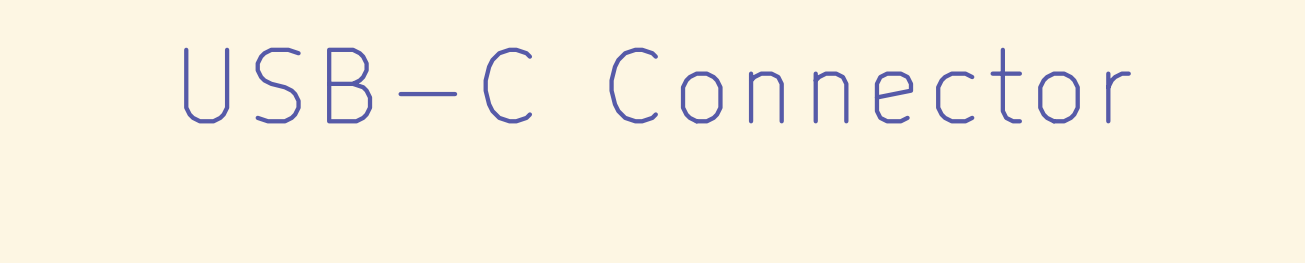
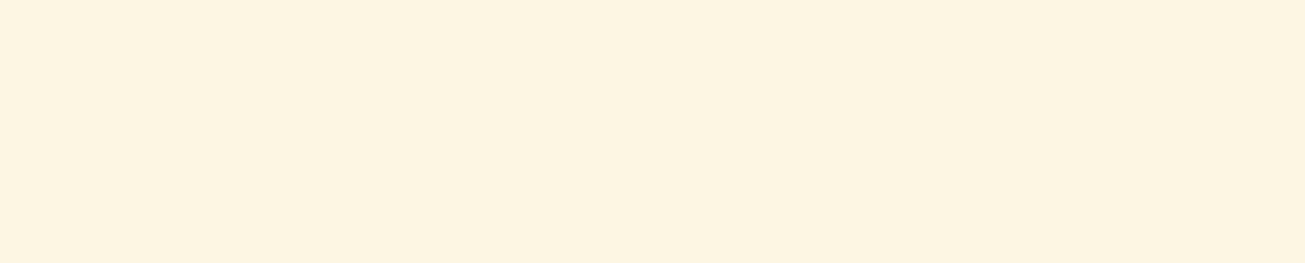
text: USB-C Connector (657, 85) -> none

